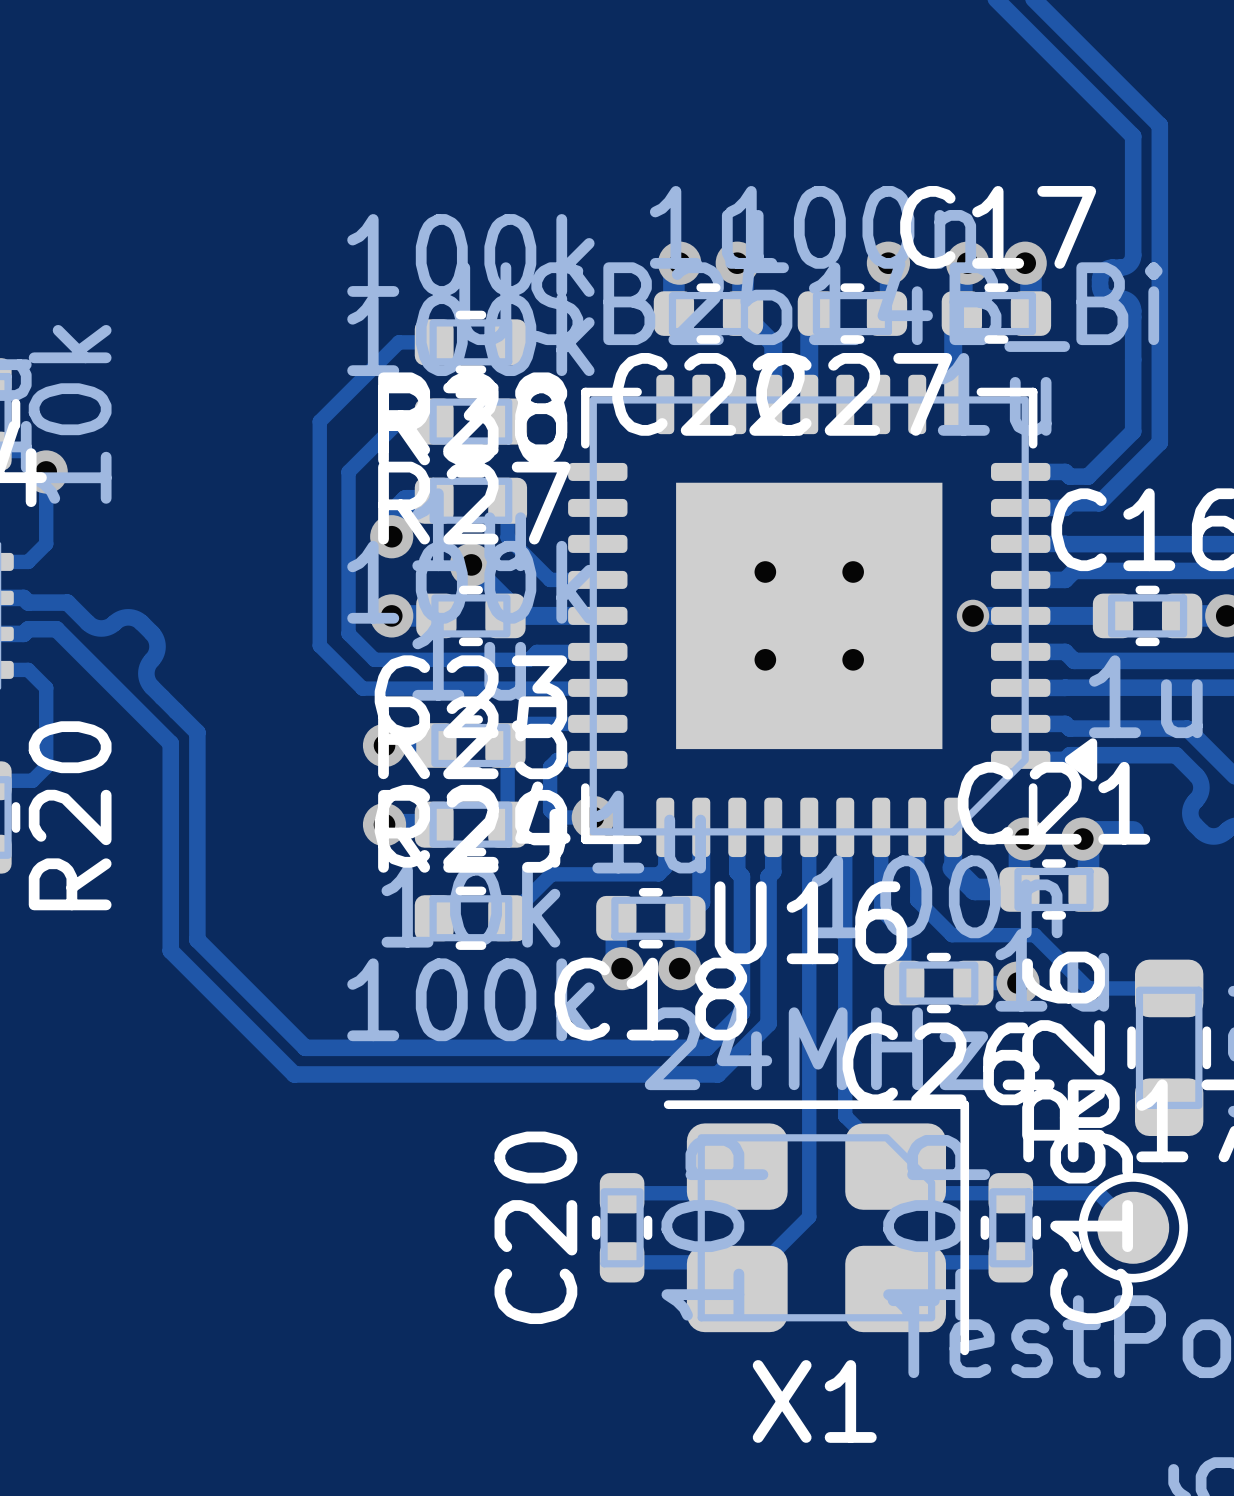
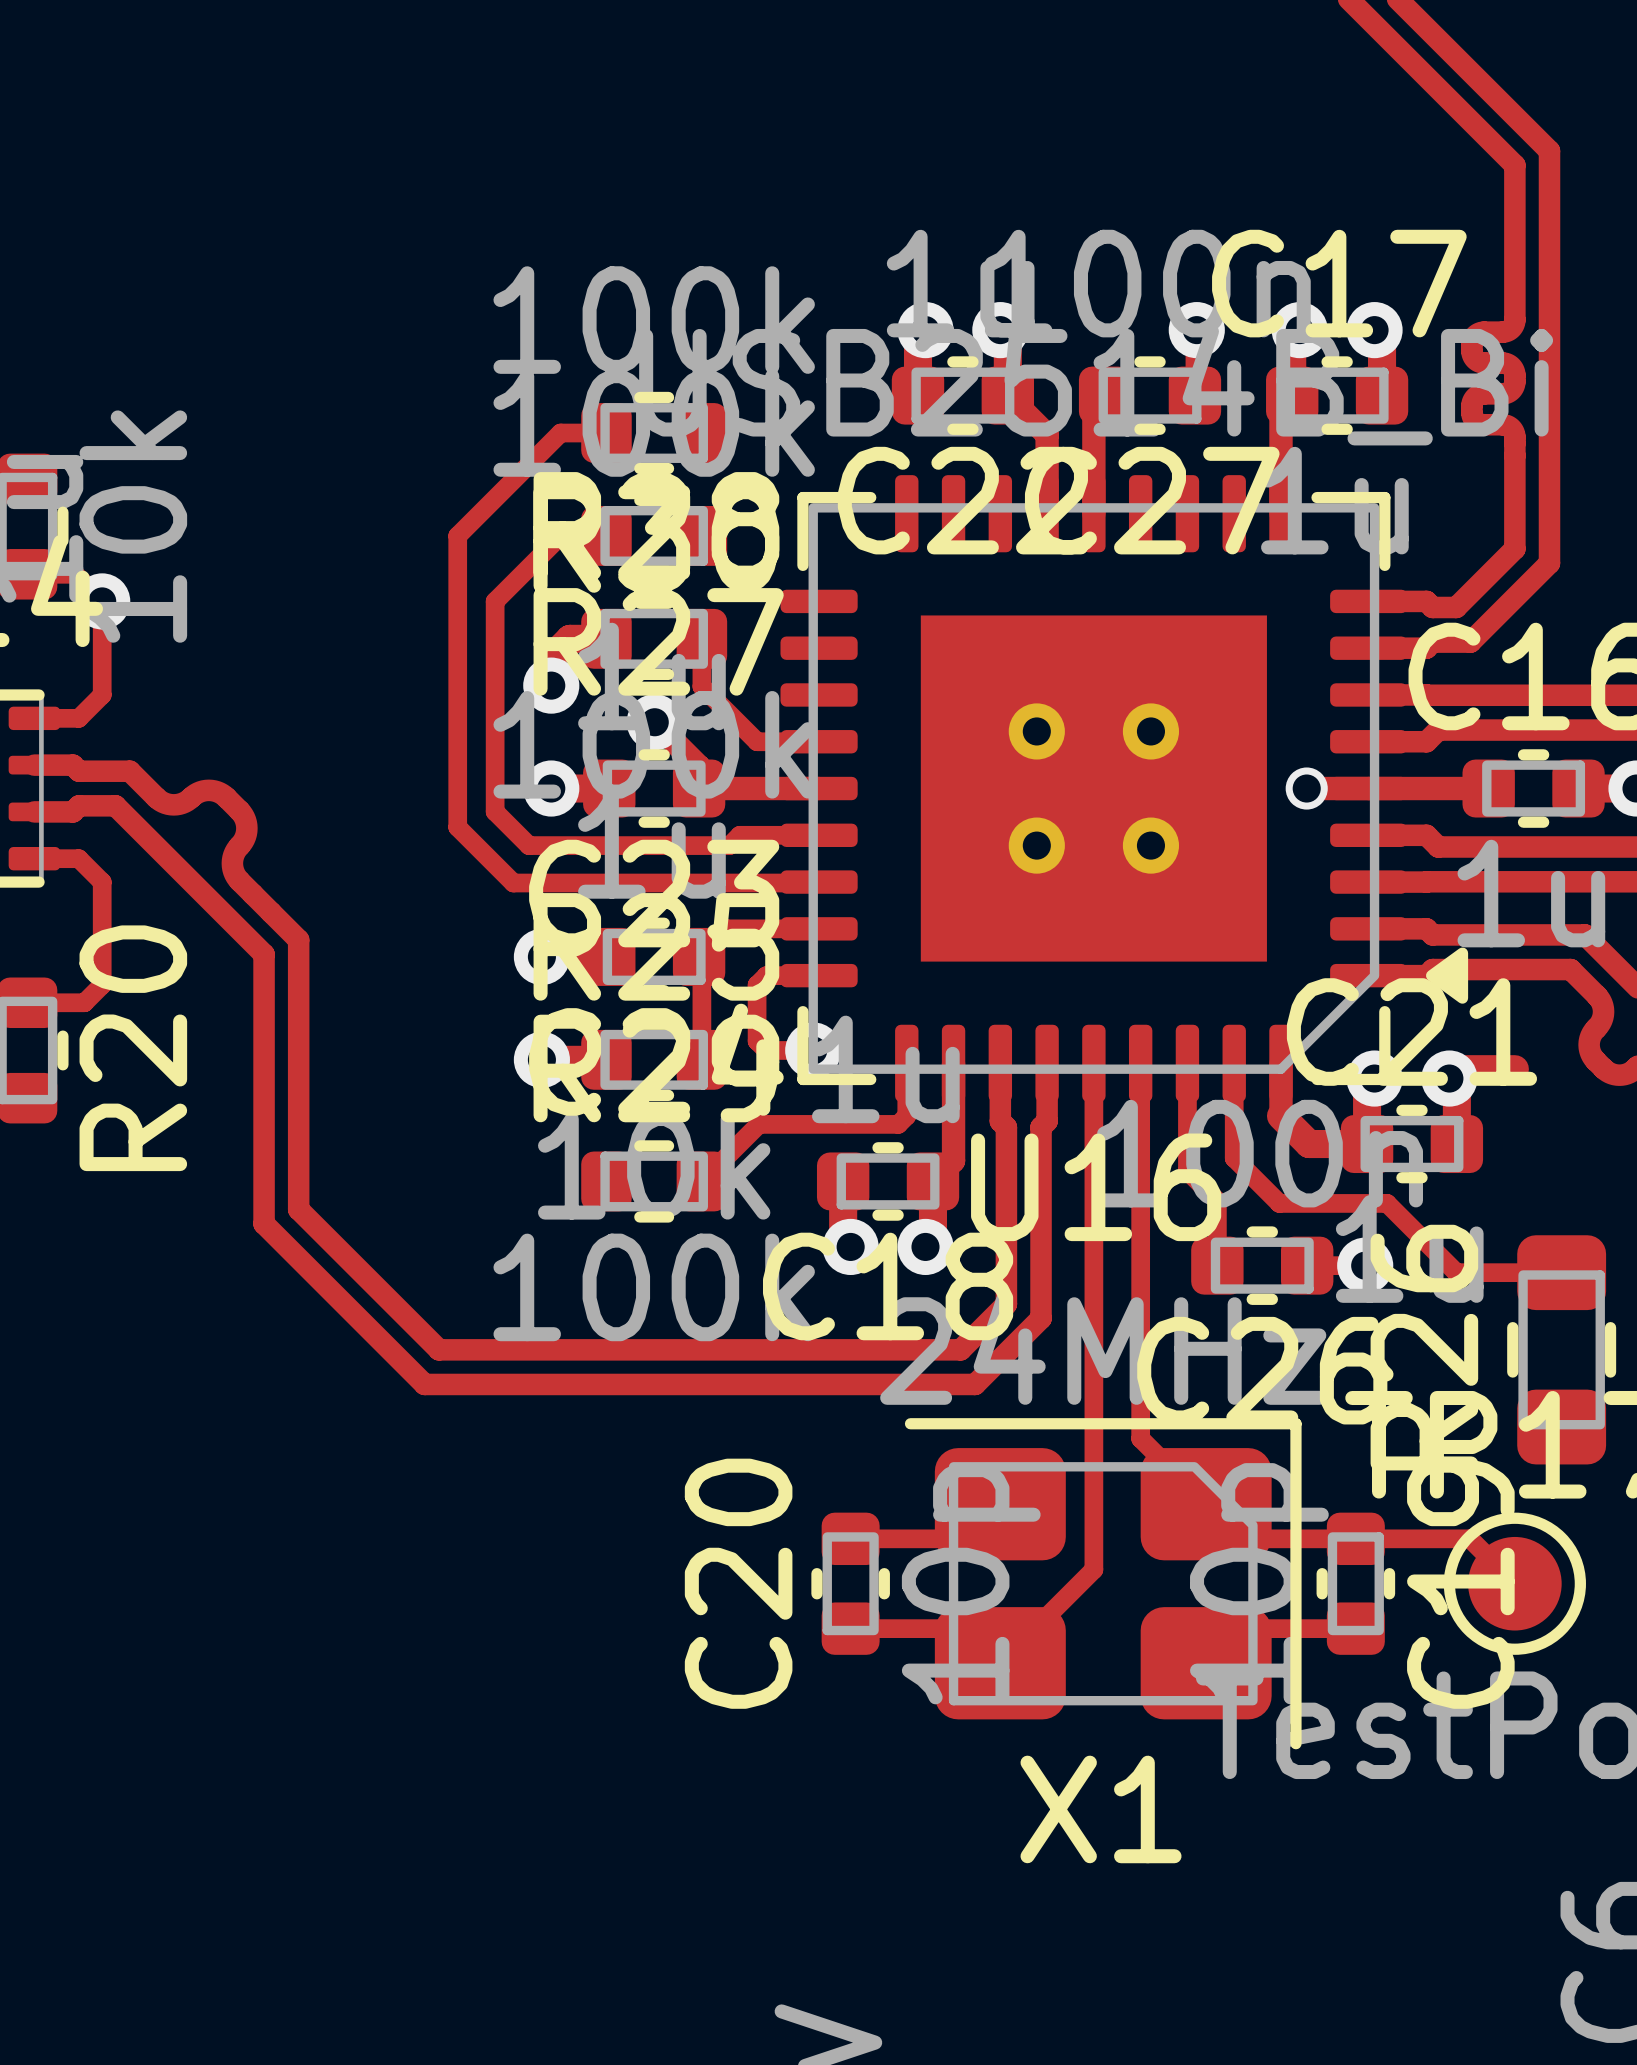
track: (1133, 255) (1131, 261) (1126, 265) (1104, 270) (1100, 280) (1100, 289) (1104, 296) (1110, 298) (1124, 299) (1131, 304) (1133, 345) -> (1514, 319) (1513, 325) (1507, 331) (1478, 333) (1473, 338) (1471, 344) (1472, 353) (1476, 360) (1482, 362) (1507, 363) (1513, 369) (1514, 375) (1513, 386) (1508, 392) (1482, 393) (1475, 397) (1471, 404) (1472, 417) (1481, 424) (1507, 425) (1512, 429) (1514, 437)

